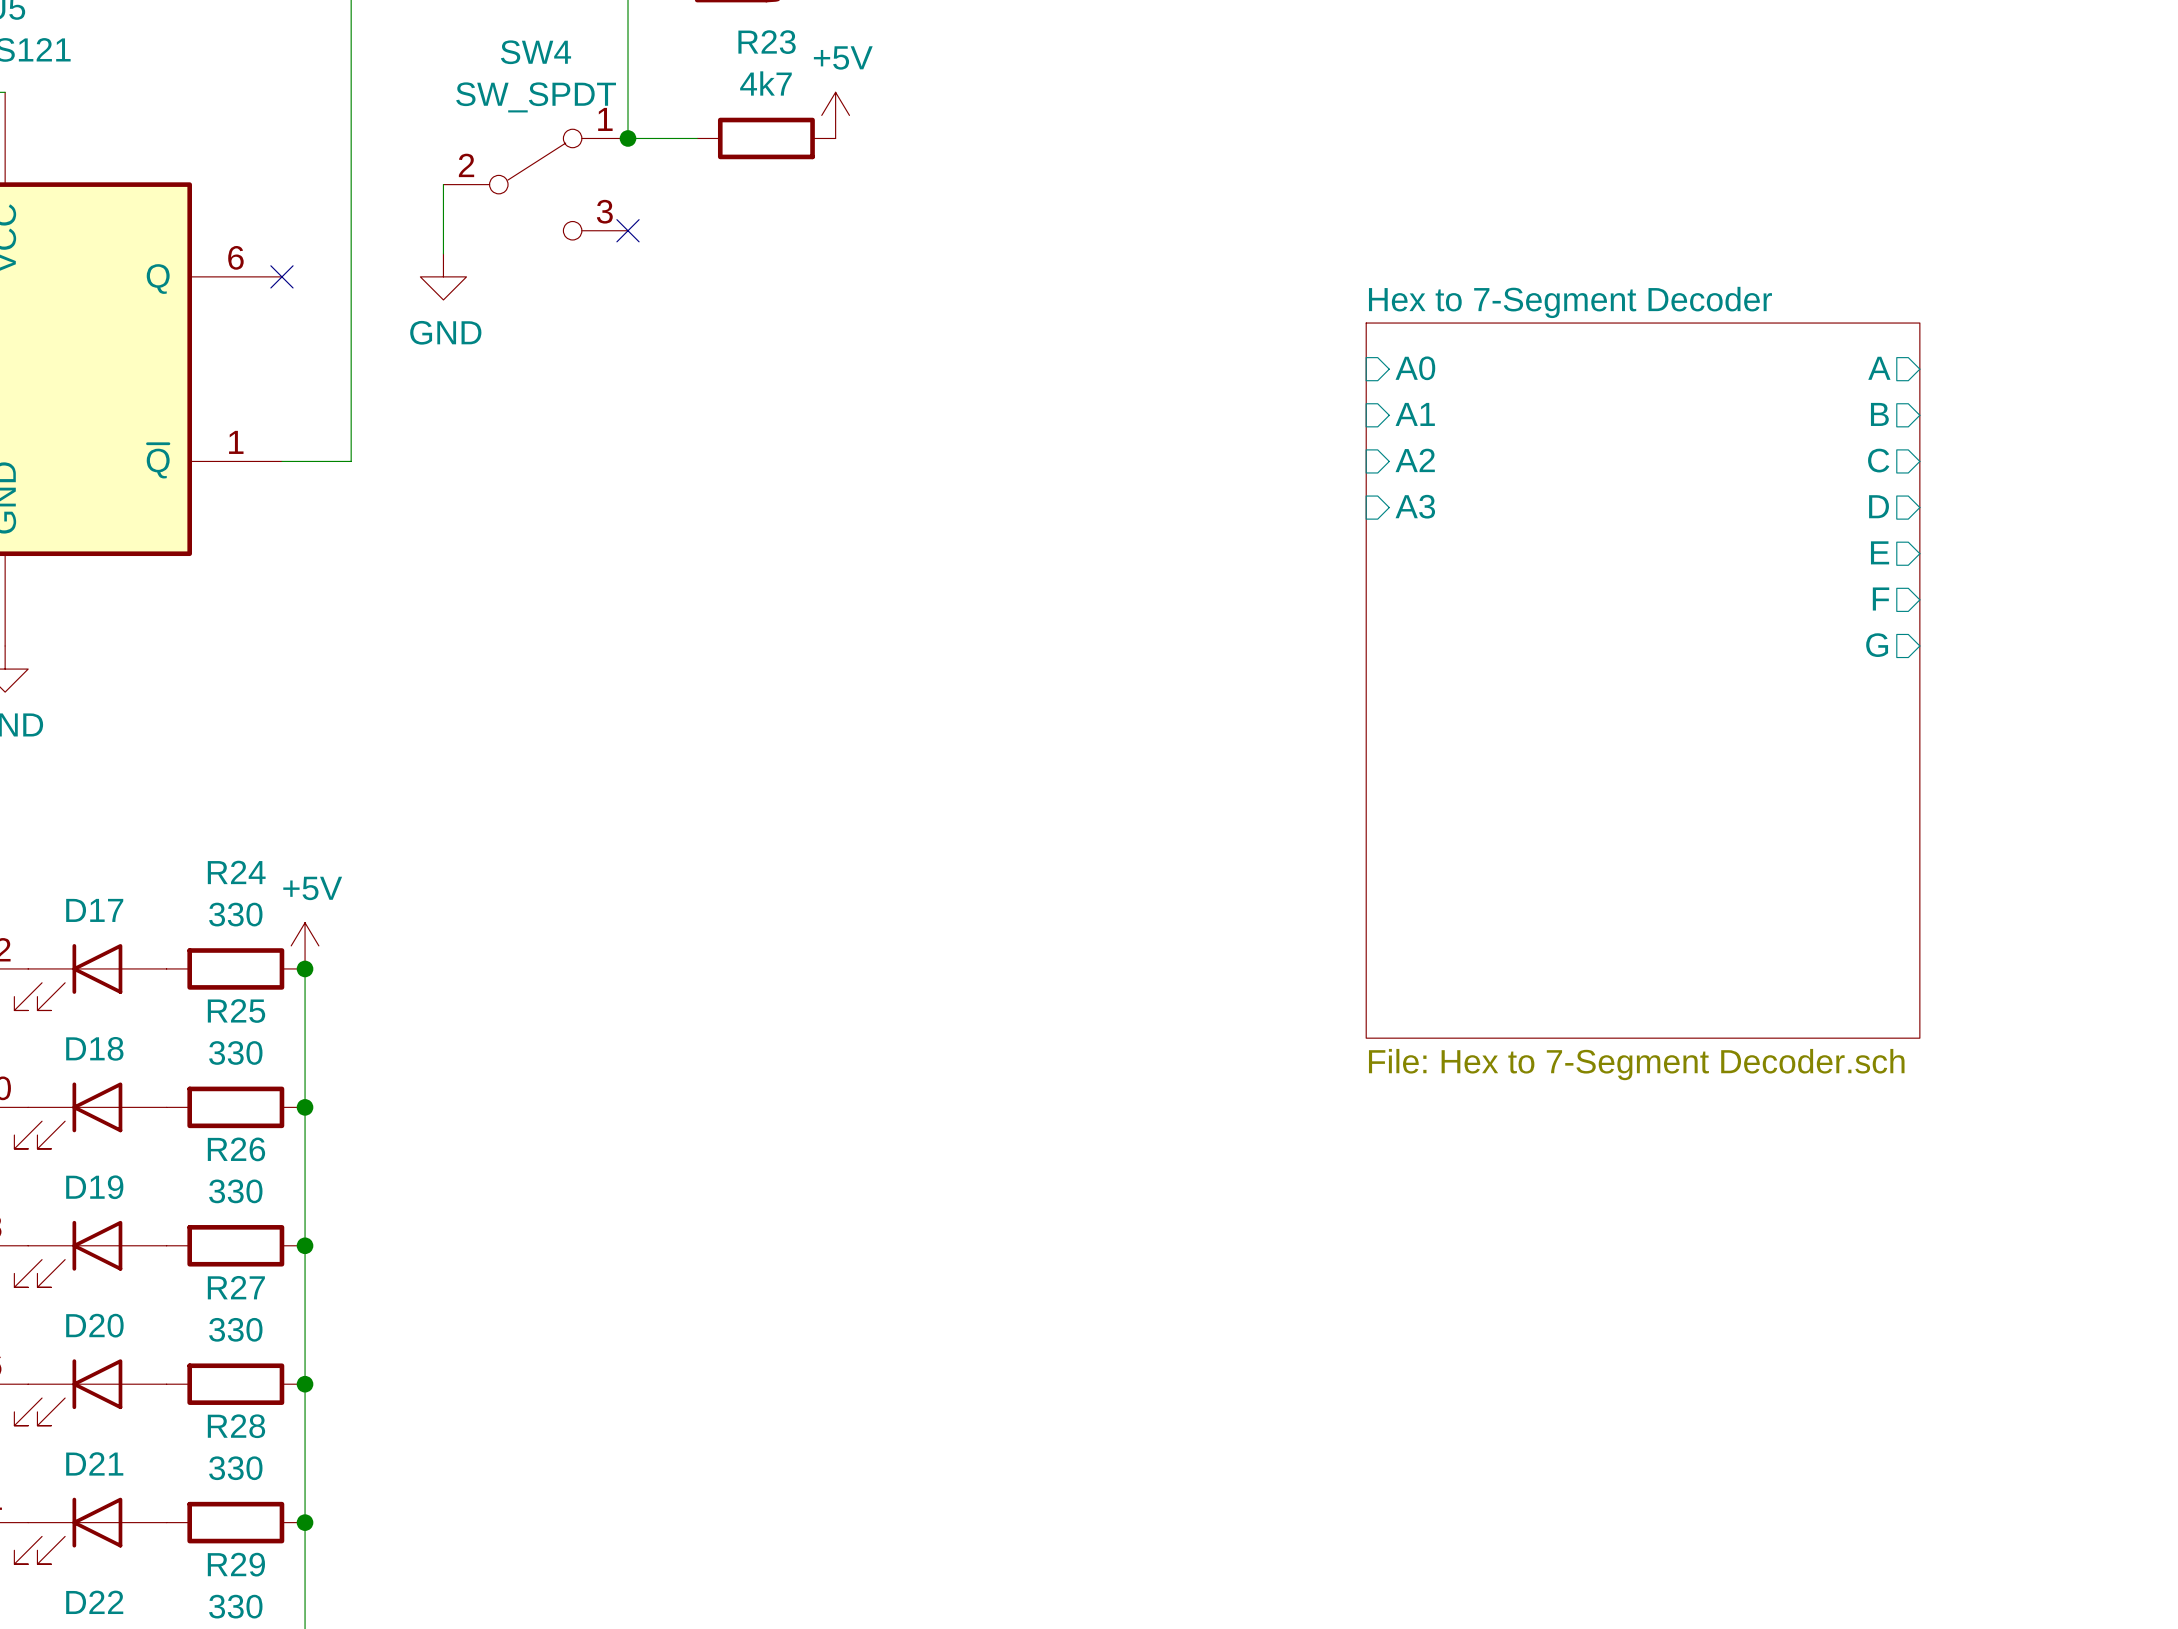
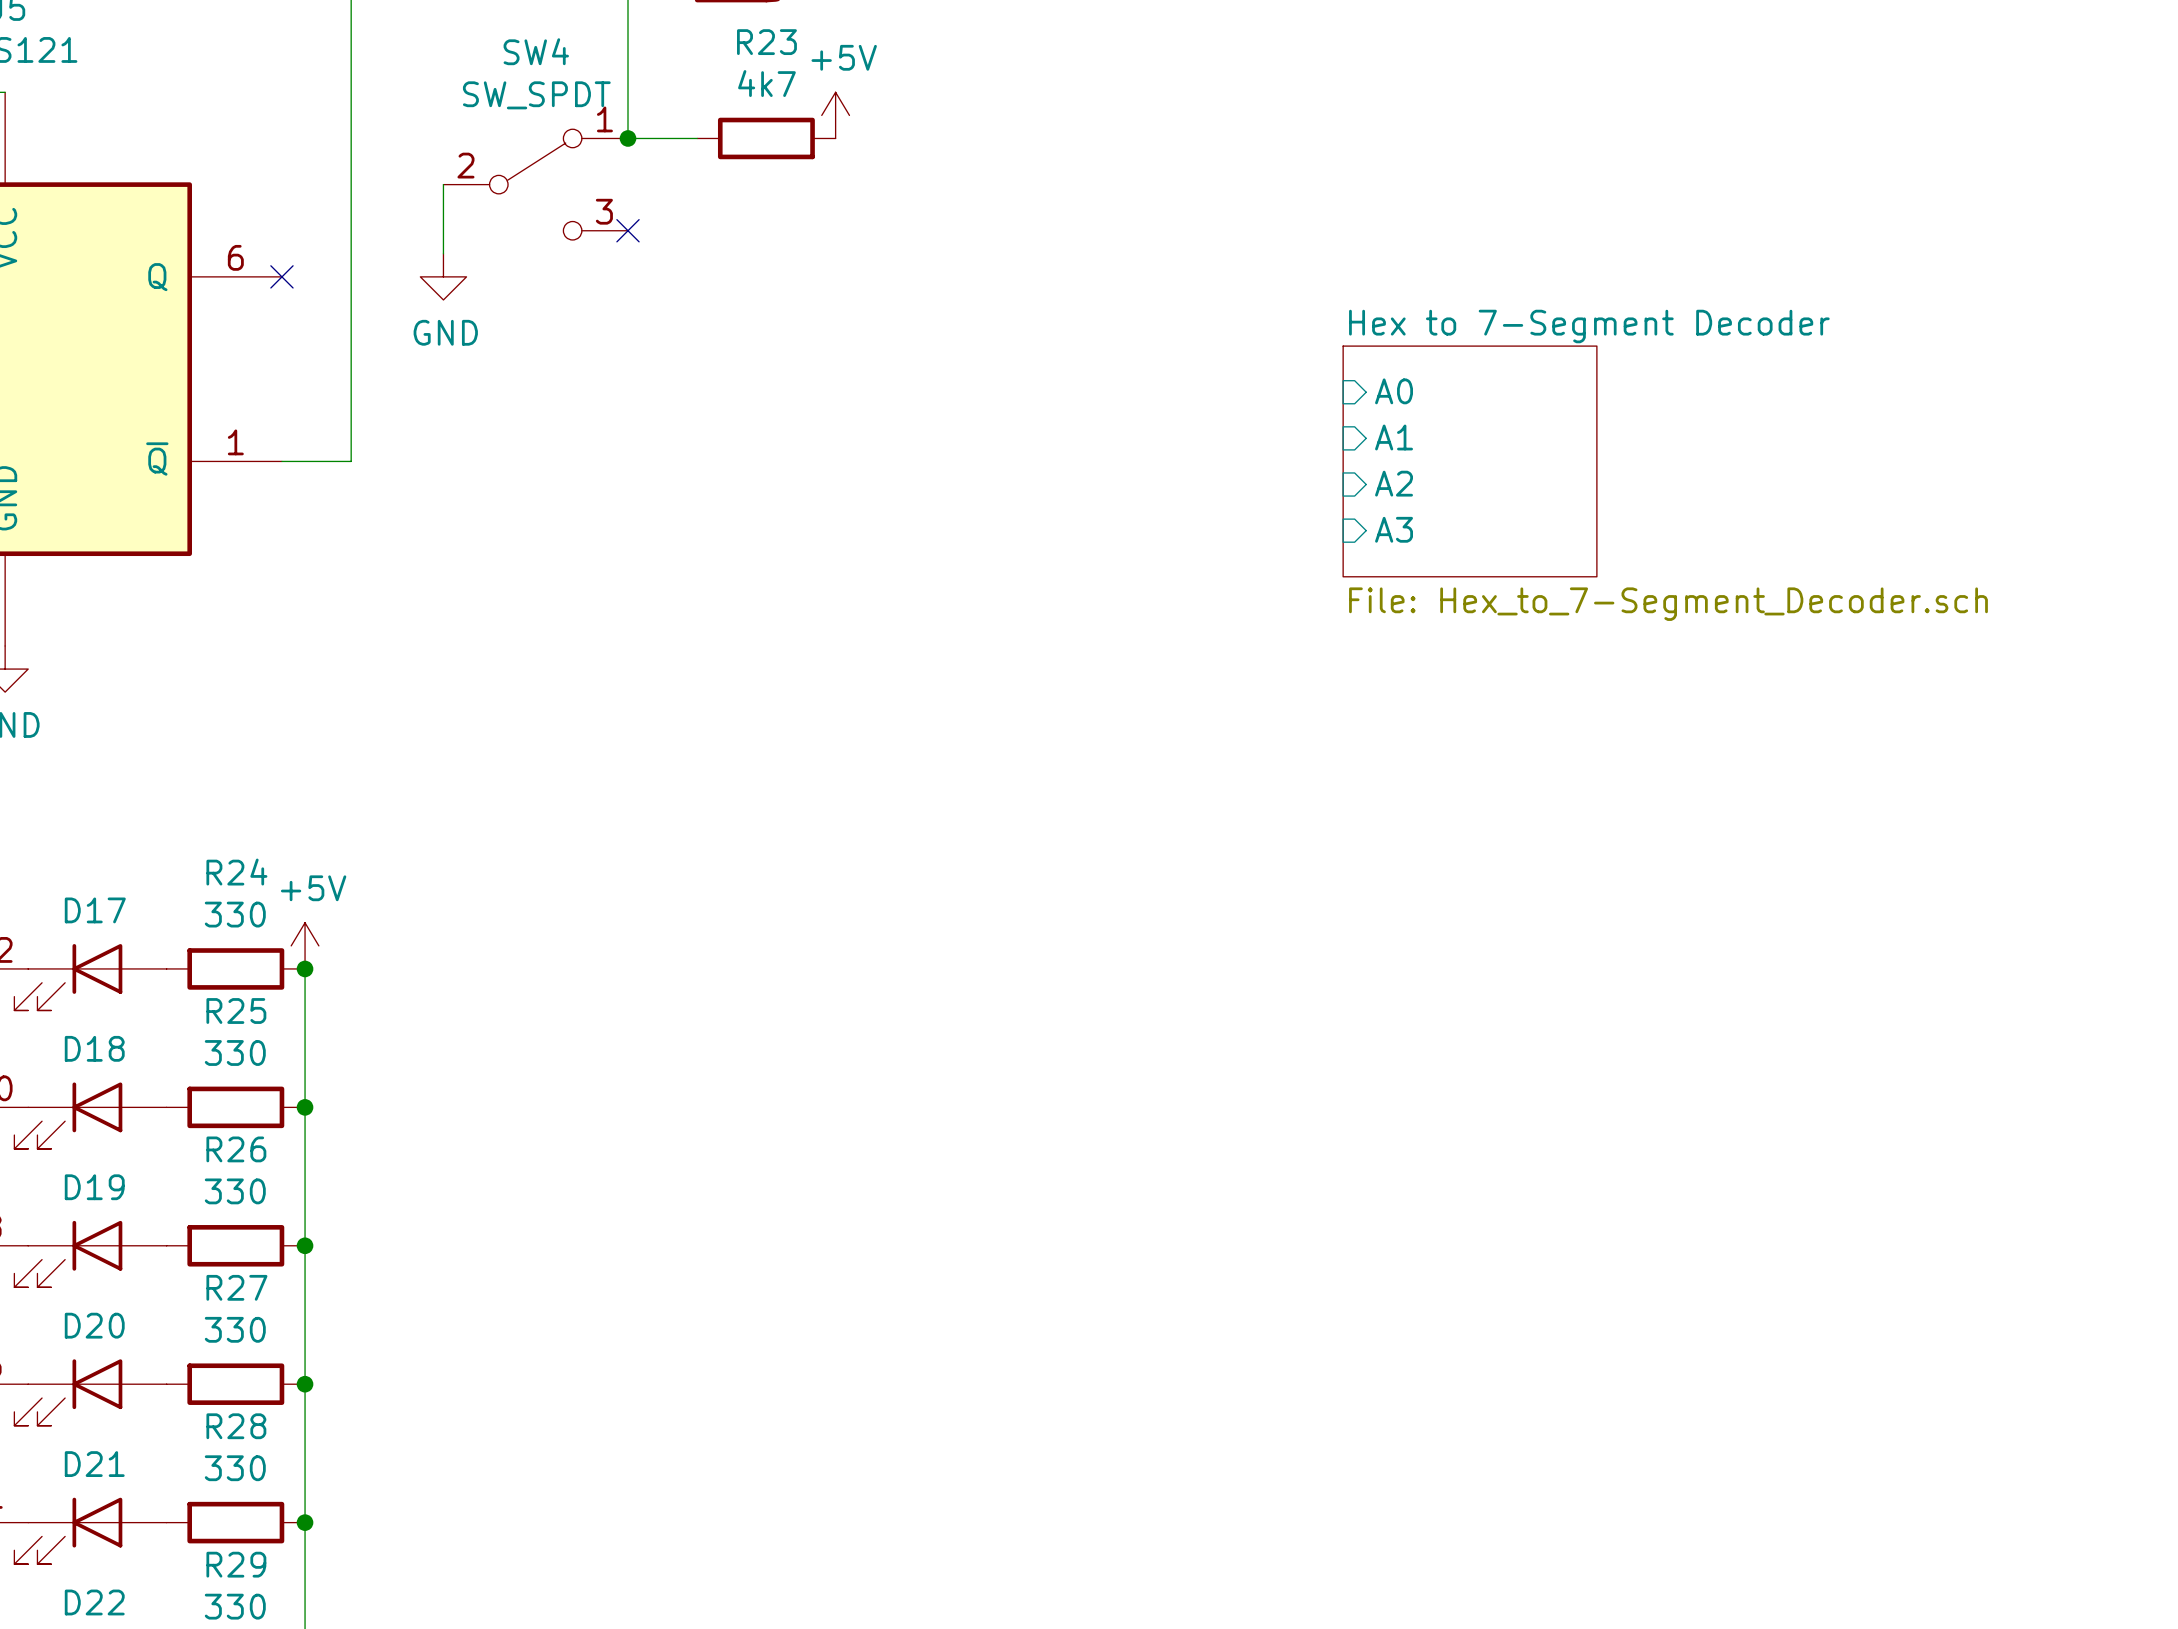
sheet Hex to 7-Segment Decoder name position: Hex to 7-Segment Decoder (1570, 302) -> Hex to 7-Segment Decoder (1589, 326)
sheet Hex to 7-Segment Decoder shape: [1366, 323, 1920, 1039] -> [1343, 346, 1597, 577]
sheet pin position: A0 (1415, 368) -> A0 (1394, 391)
sheet pin: A (1879, 368) -> none
sheet pin position: A1 (1415, 414) -> A1 (1394, 437)
sheet pin: B (1879, 414) -> none
sheet pin position: A2 (1415, 460) -> A2 (1394, 483)
sheet pin: C (1878, 460) -> none
sheet pin position: A3 (1415, 506) -> A3 (1394, 529)
sheet pin: D (1879, 506) -> none
sheet pin: E (1880, 552) -> none
sheet pin: F (1881, 598) -> none
sheet pin: G (1877, 645) -> none
sheet Hex to 7-Segment Decoder value: File: Hex to 7-Segment Decoder.sch (1636, 1064) -> File: Hex_to_7-Segment_Decoder.sch (1668, 604)

